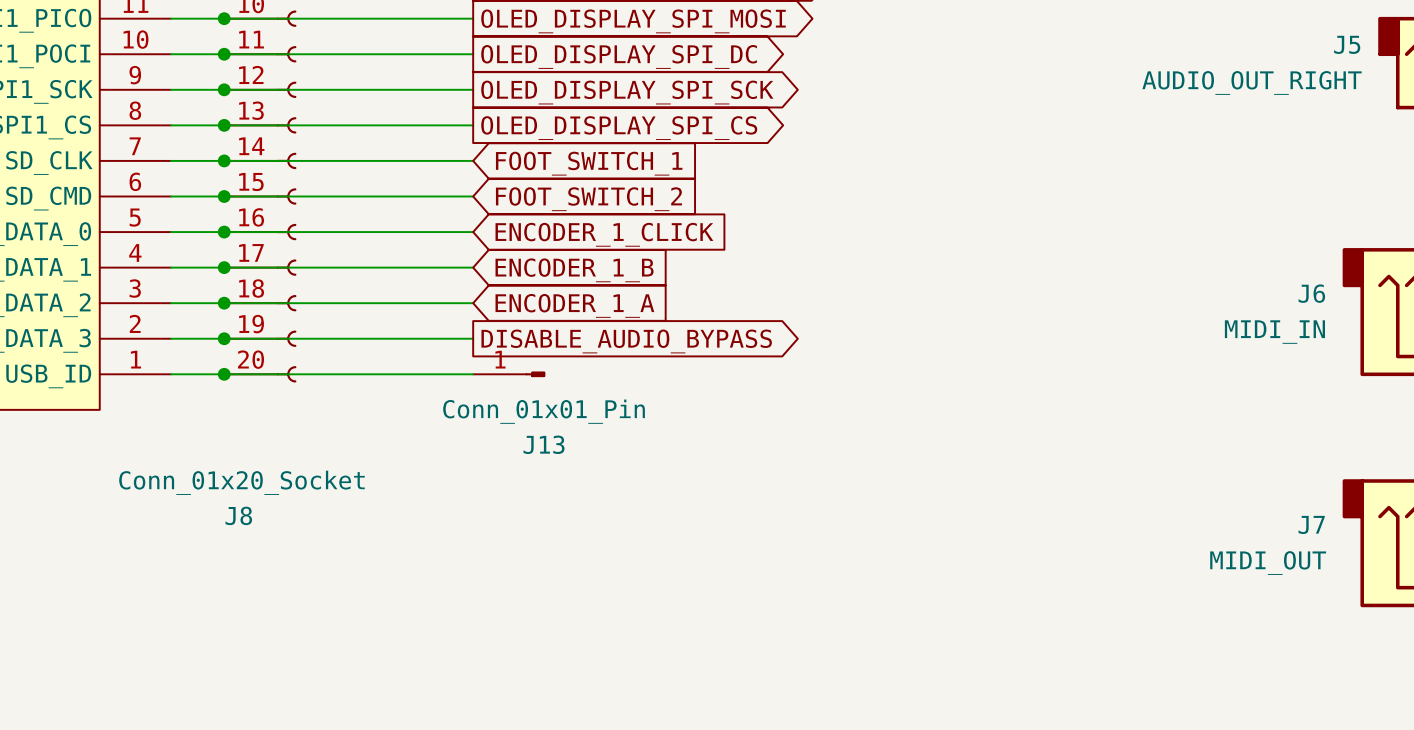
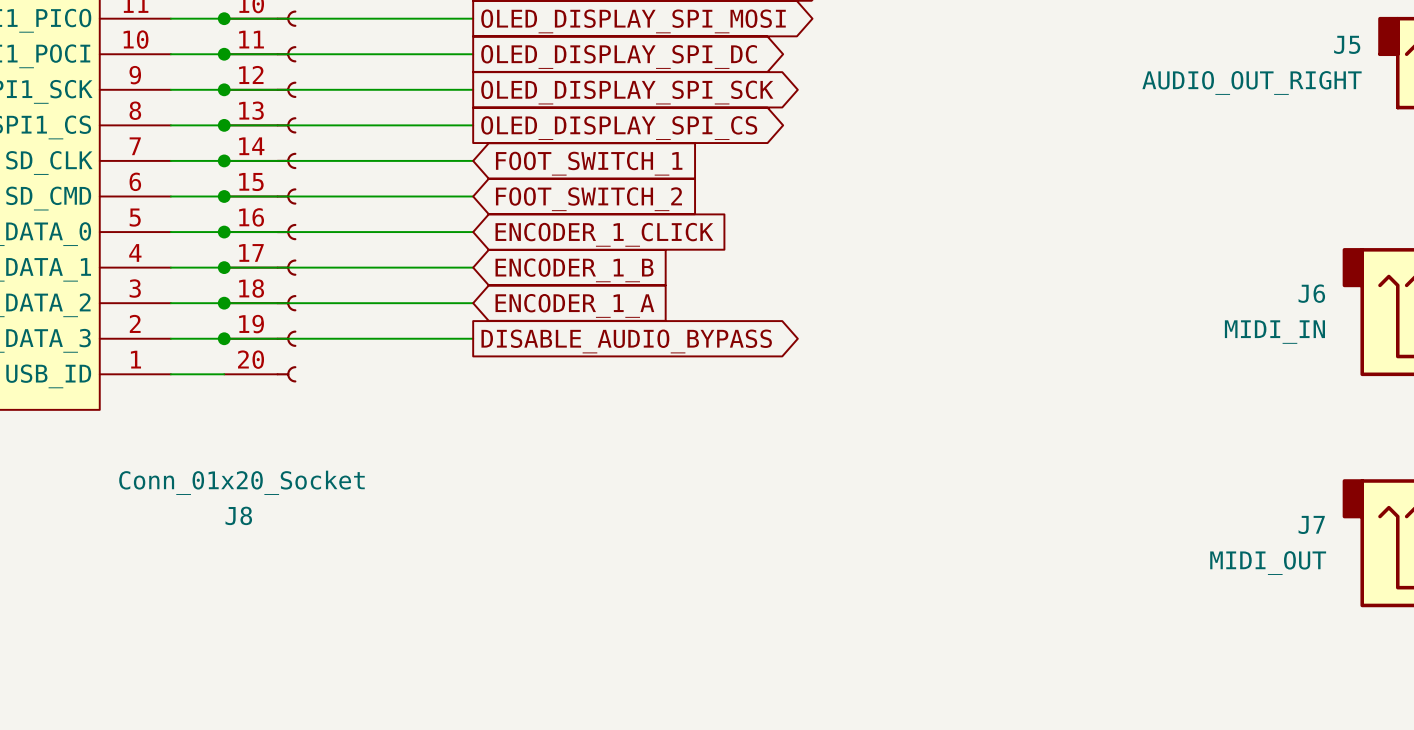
wire: (224, 374) (473, 374) -> none
junction: (224, 374) -> none
J13: Conn_01x01_Pin (509, 374) -> none

